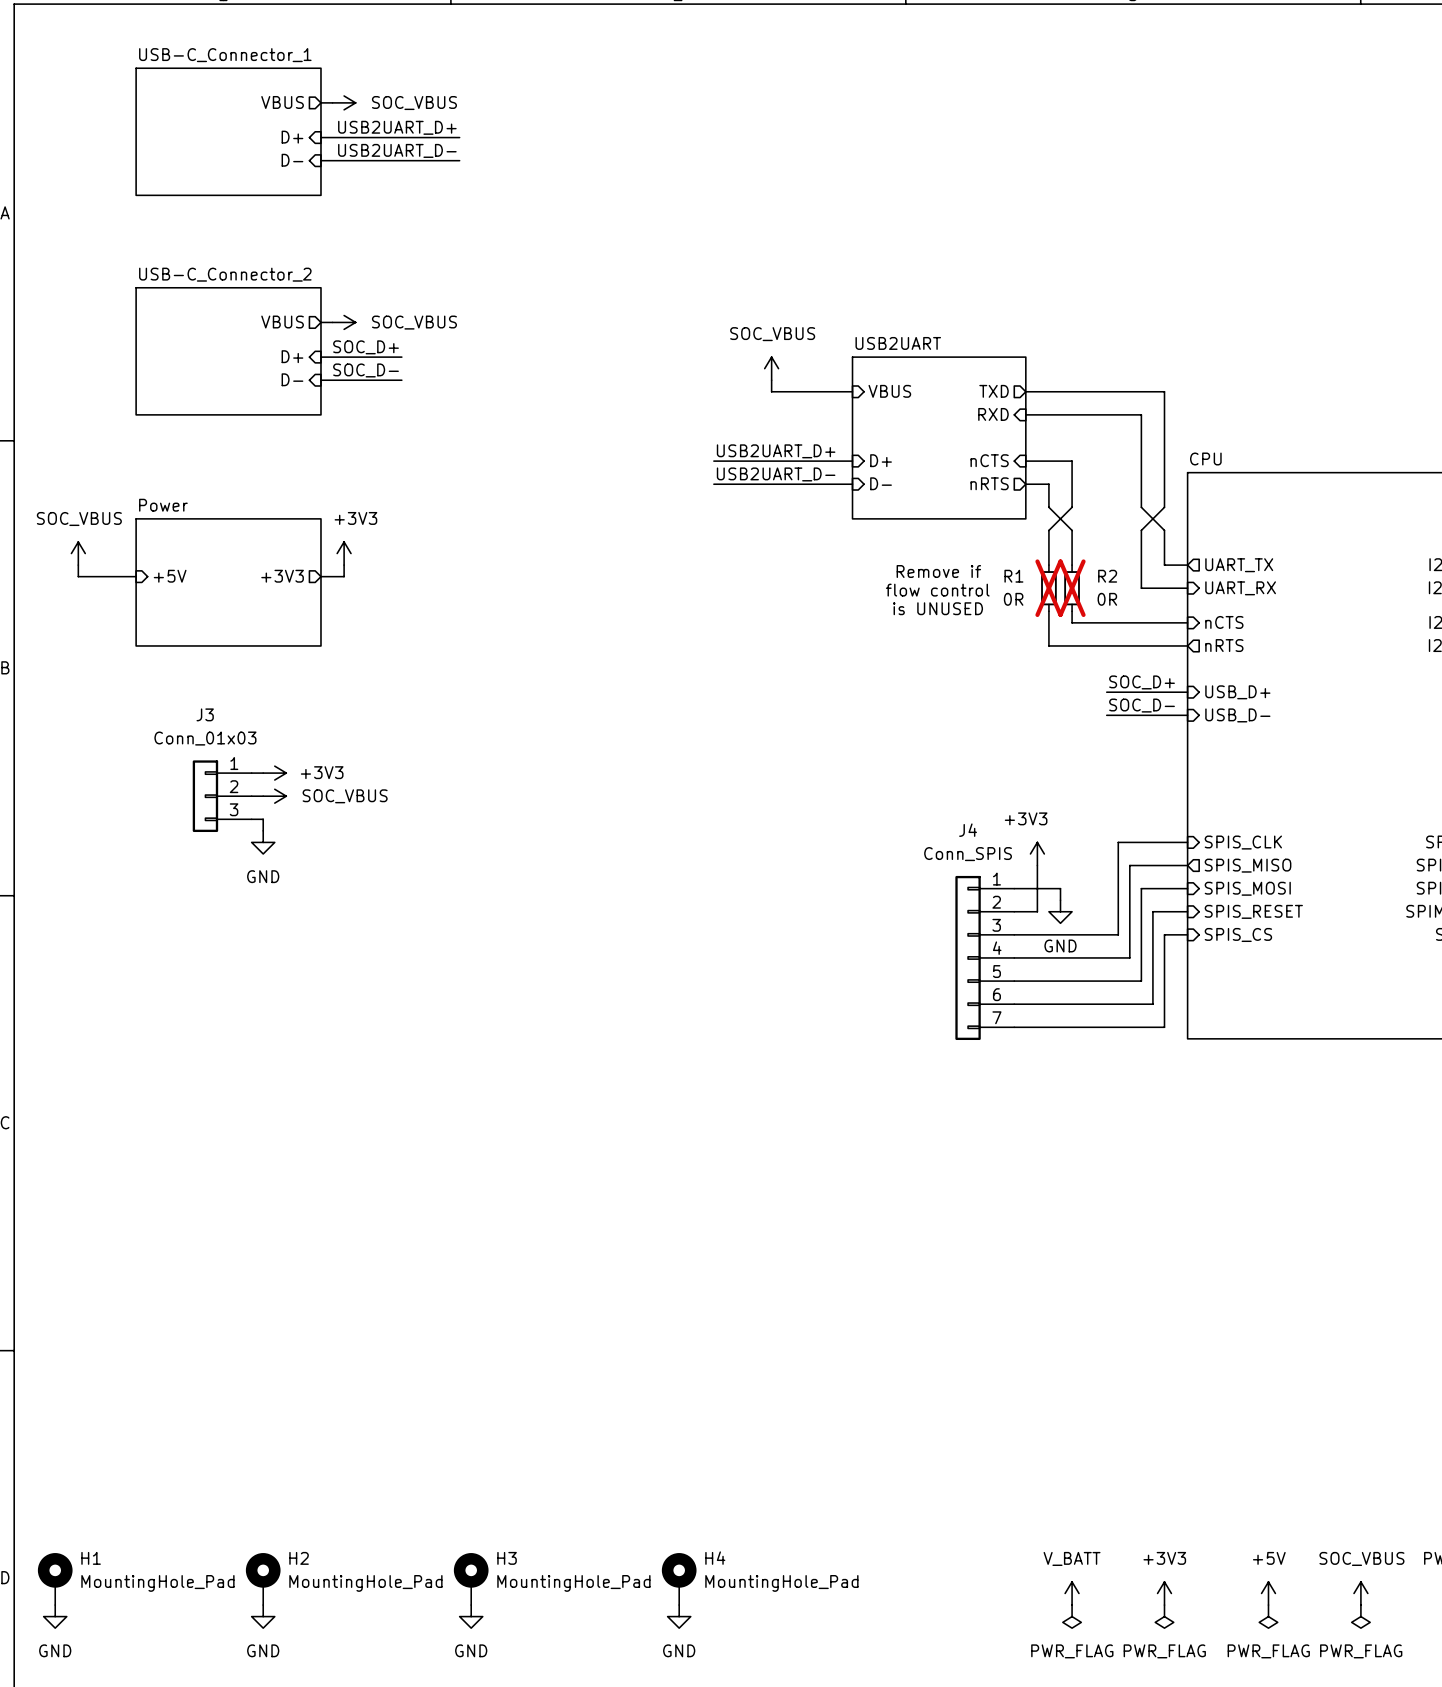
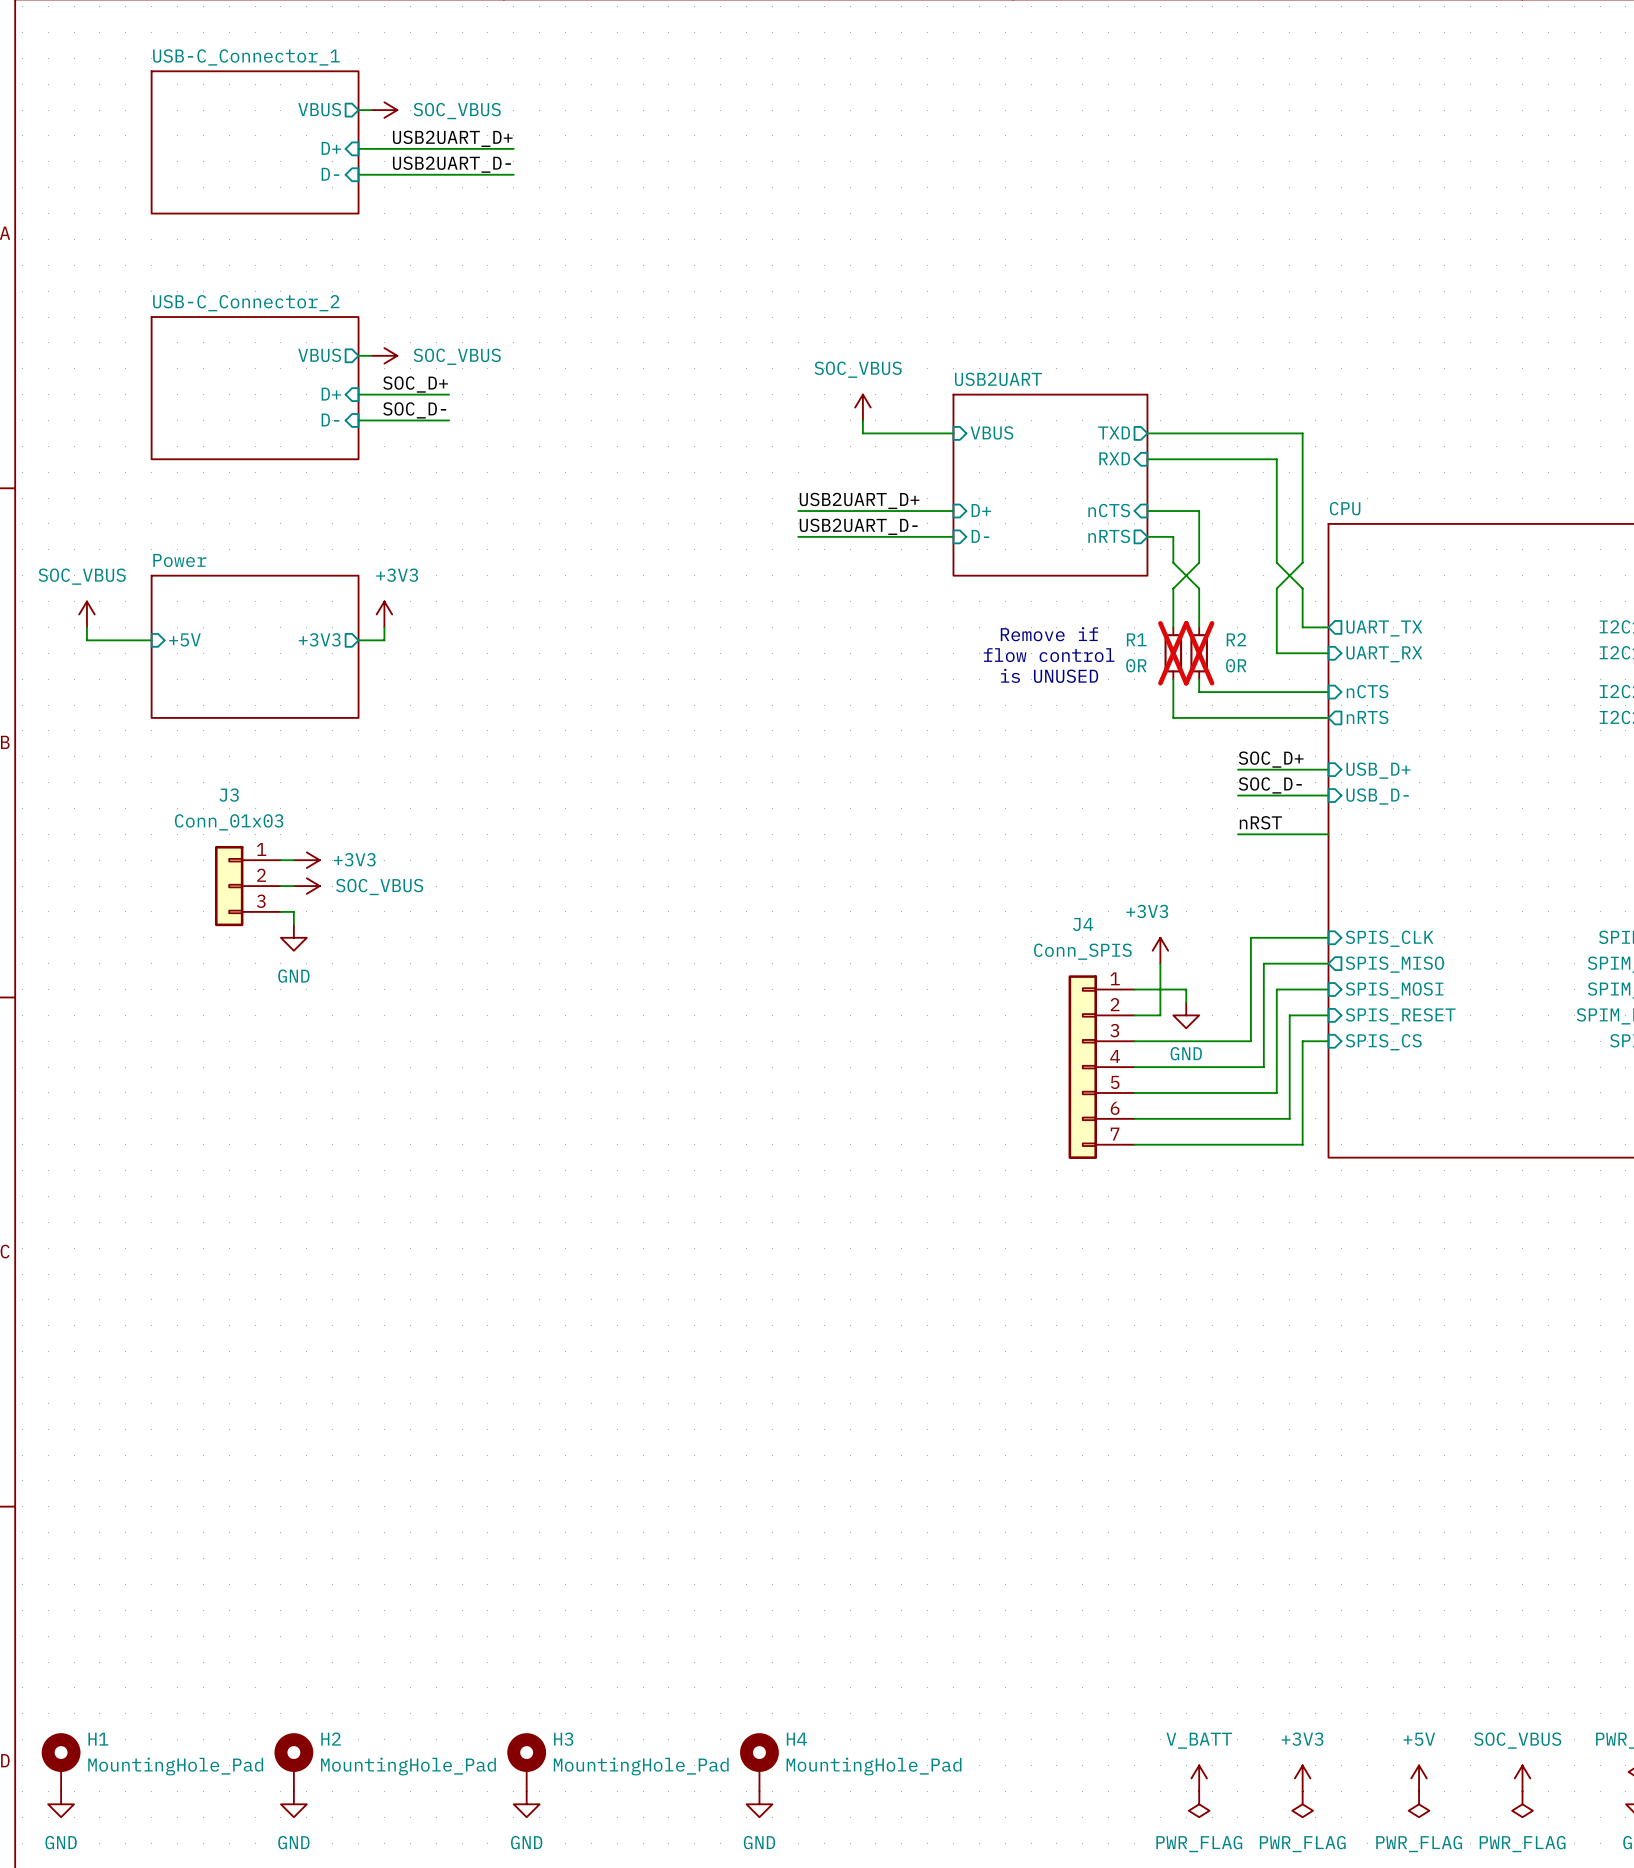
label: none -> nRST (1260, 822)
wire: none -> (1237, 834) (1328, 834)

